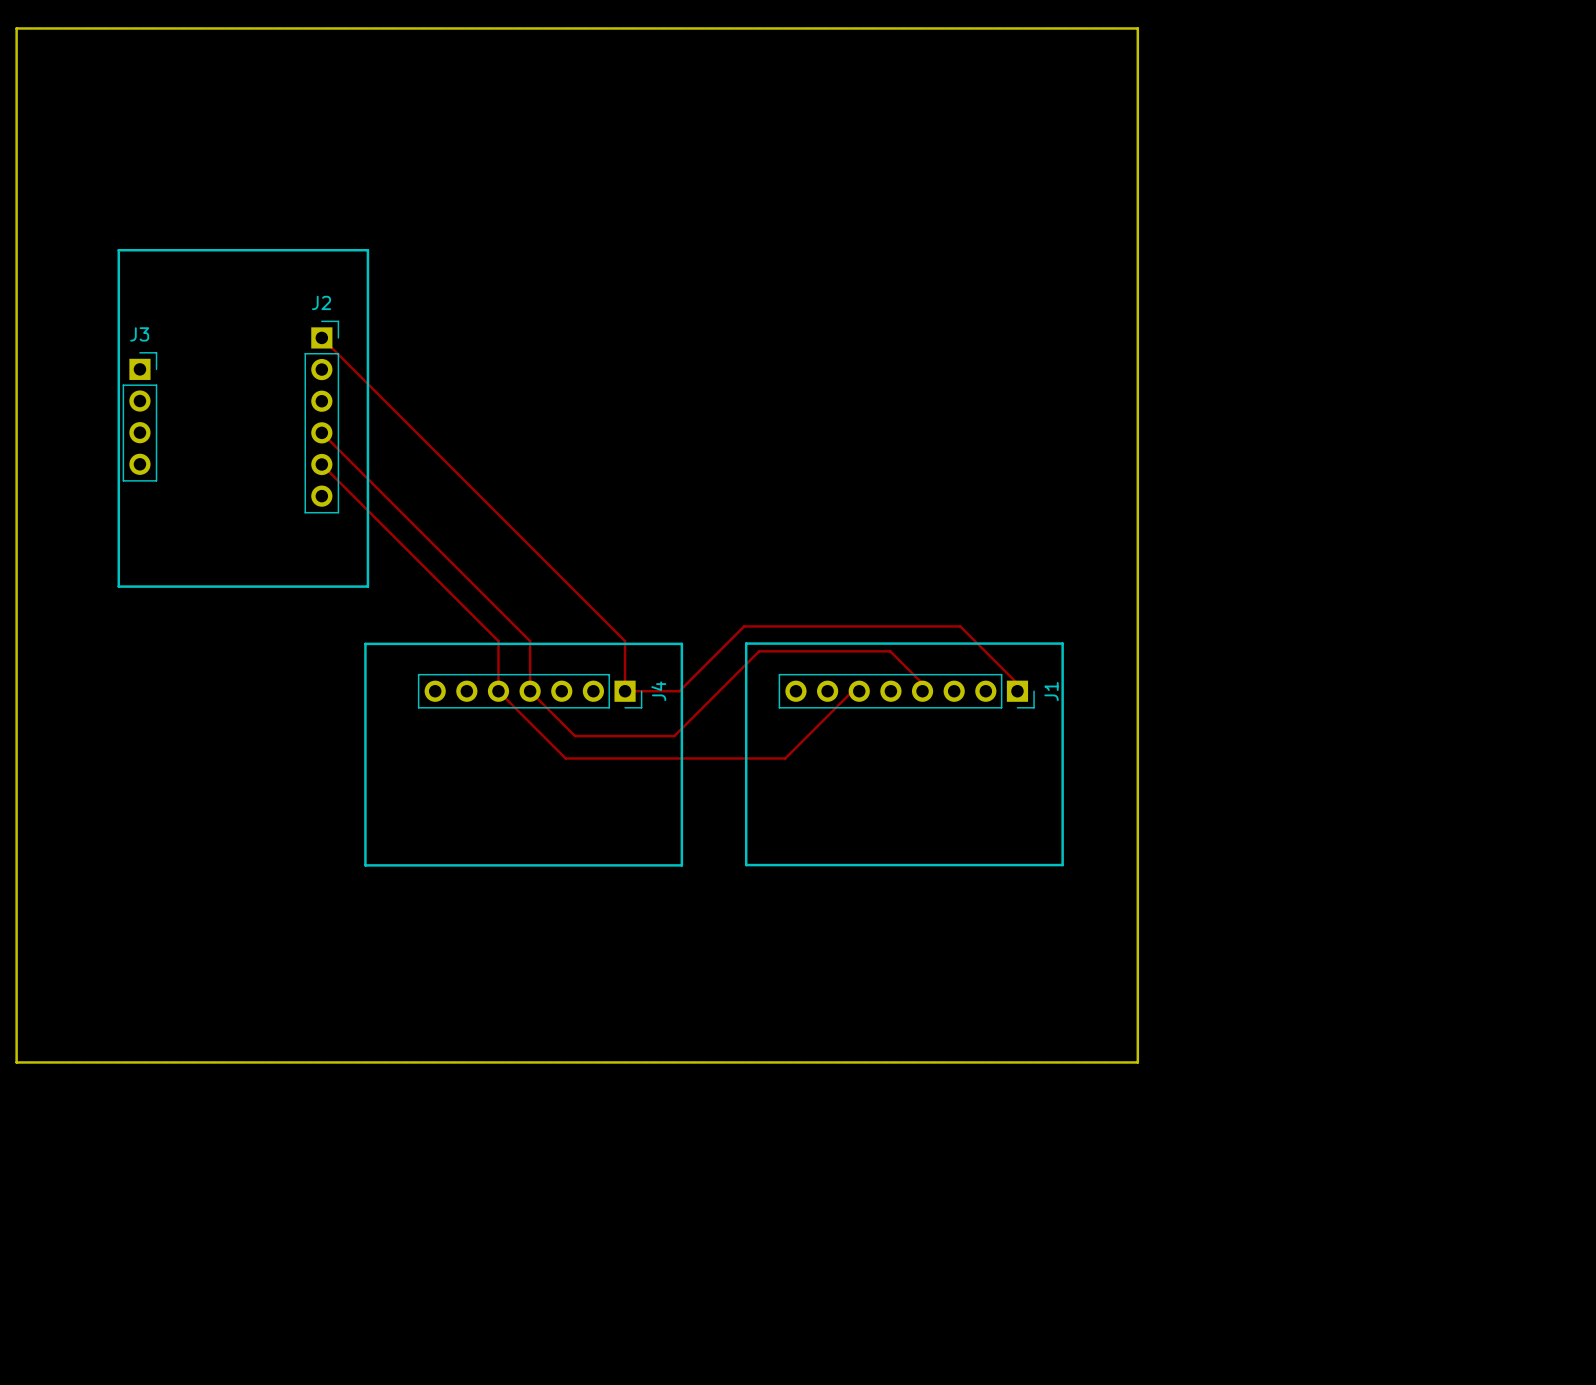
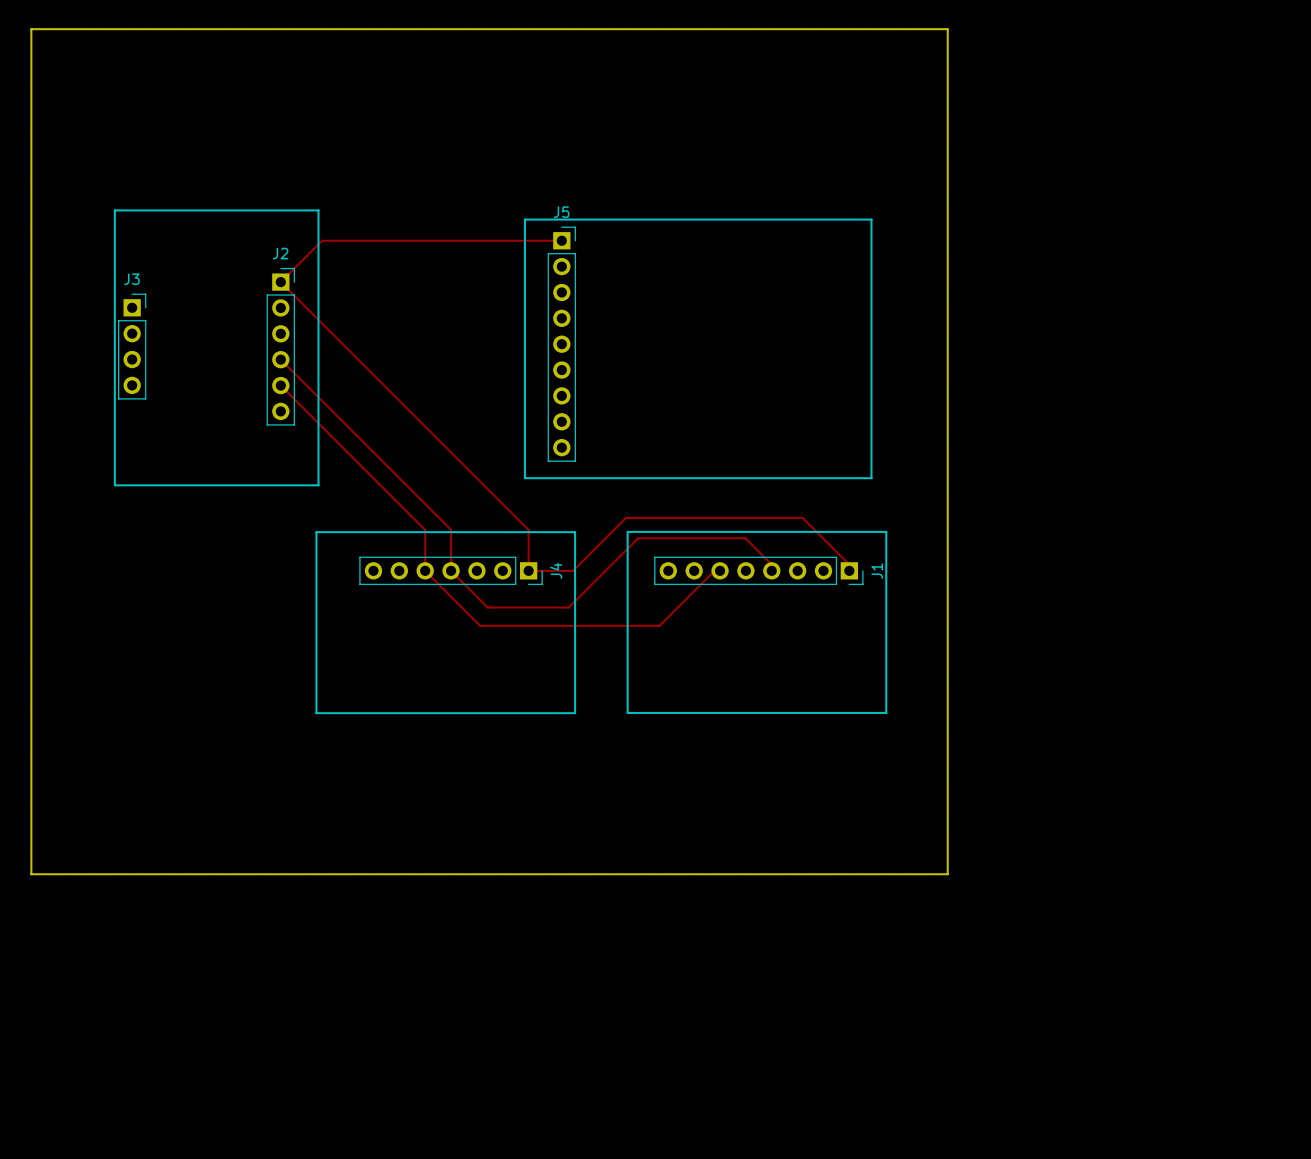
line: none -> (524, 219) (871, 219) (871, 478) (524, 478) (524, 219)
track: none -> (561, 240) (322, 240) (280, 282)
J5: none -> (561, 344)

